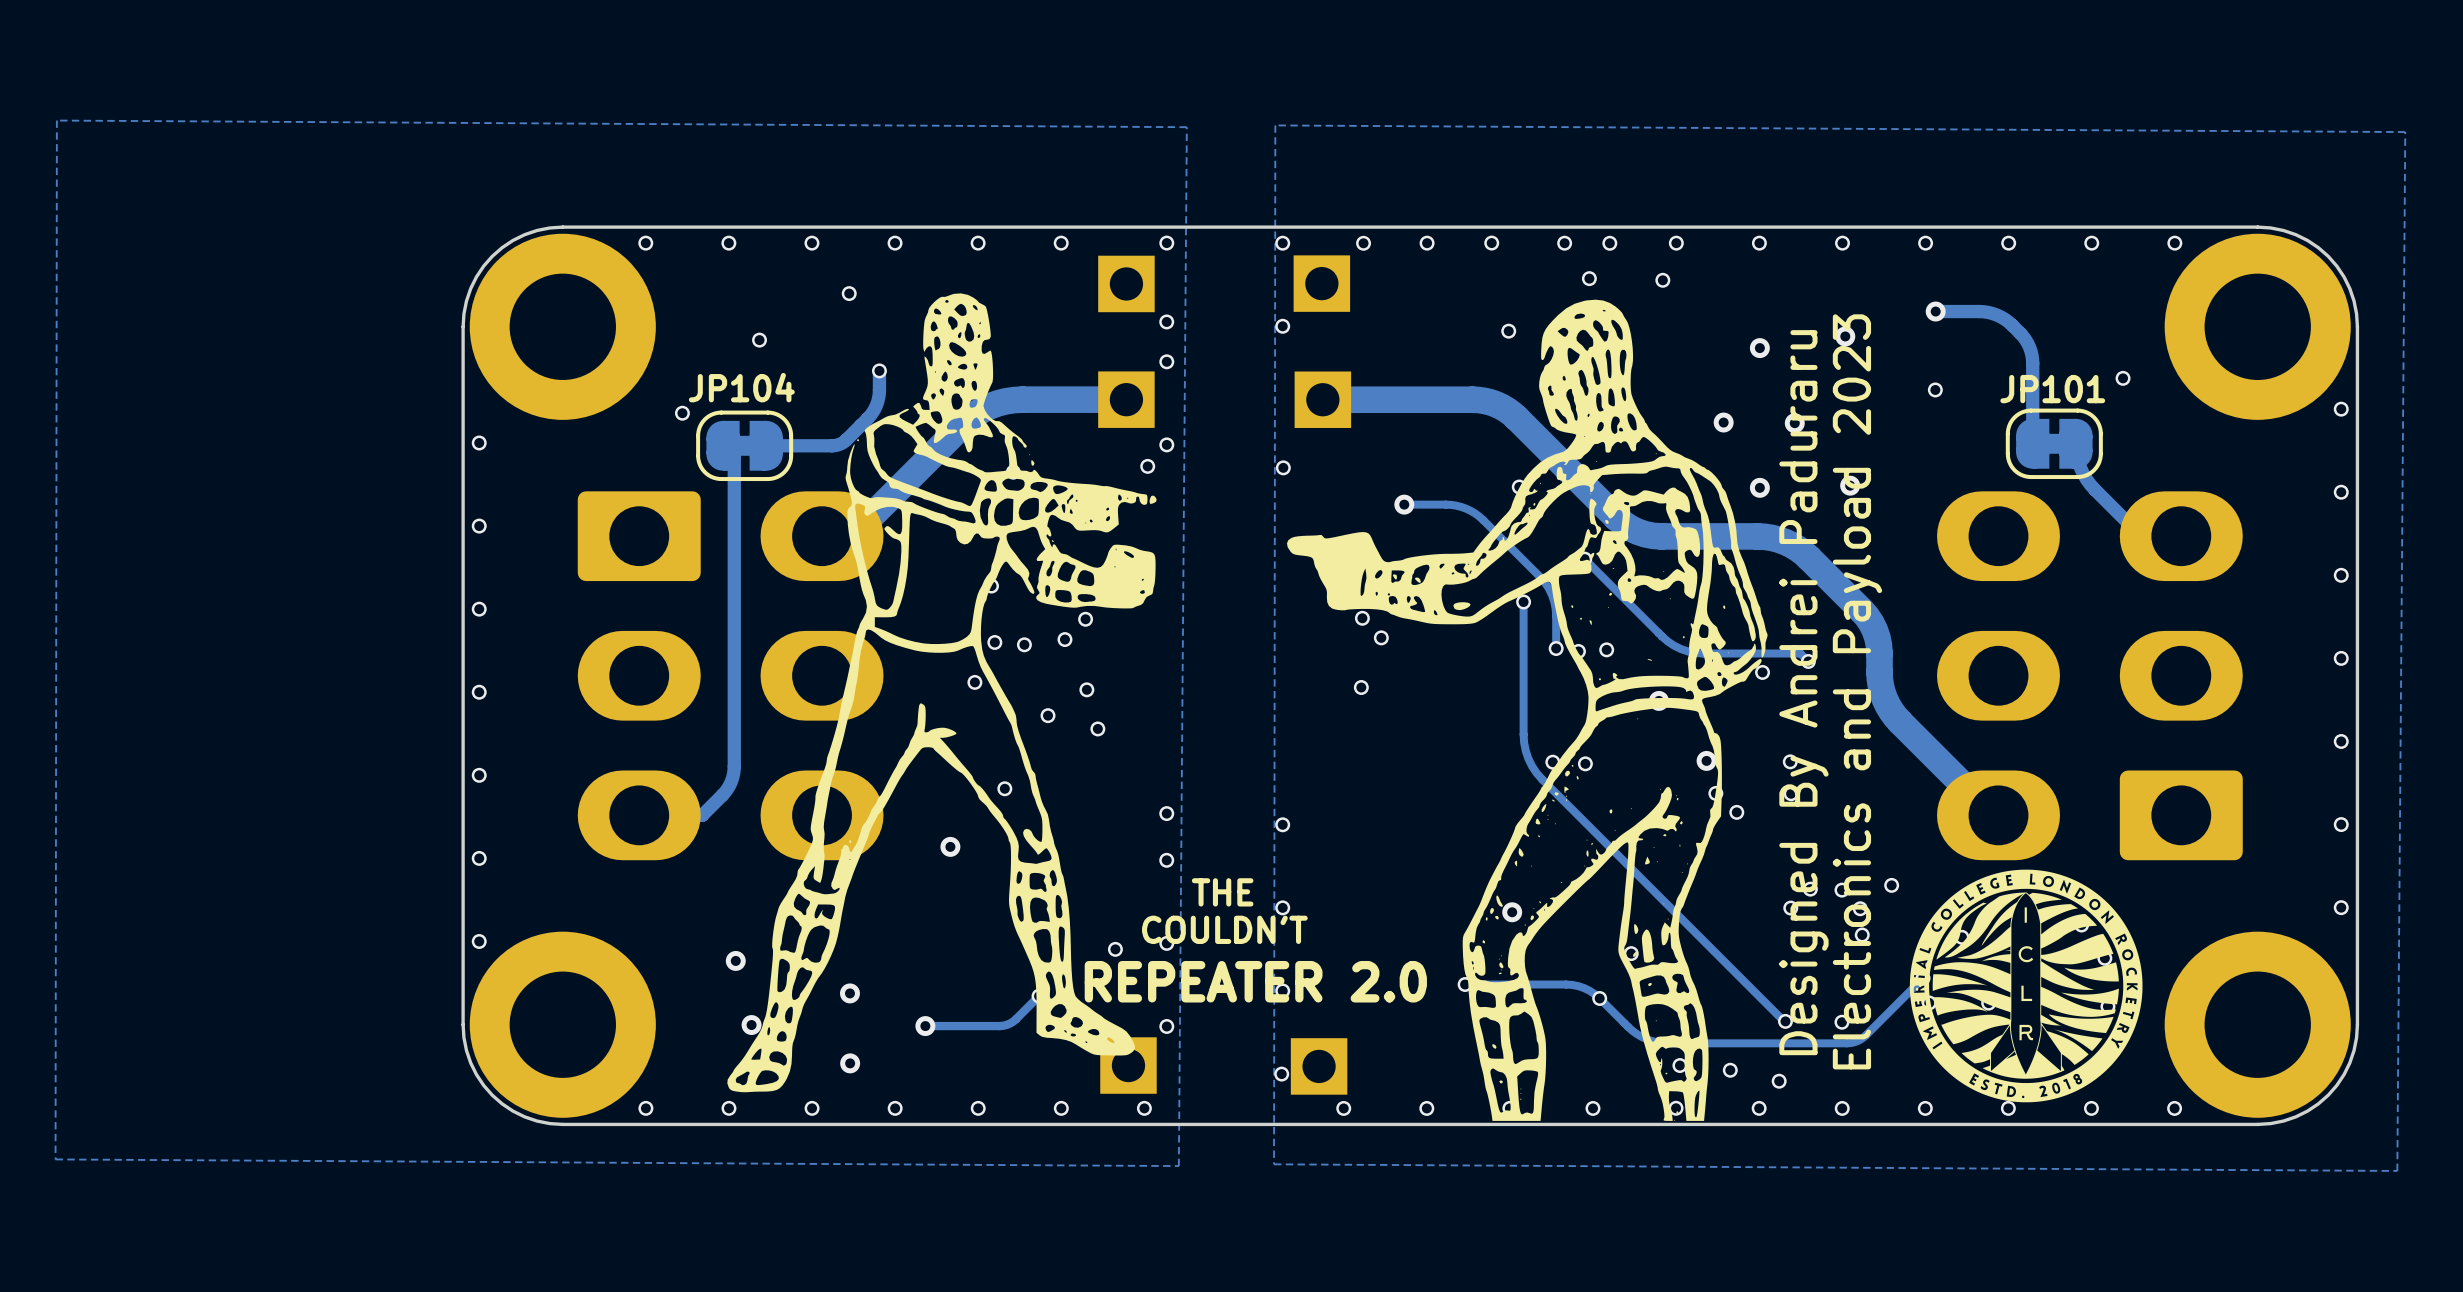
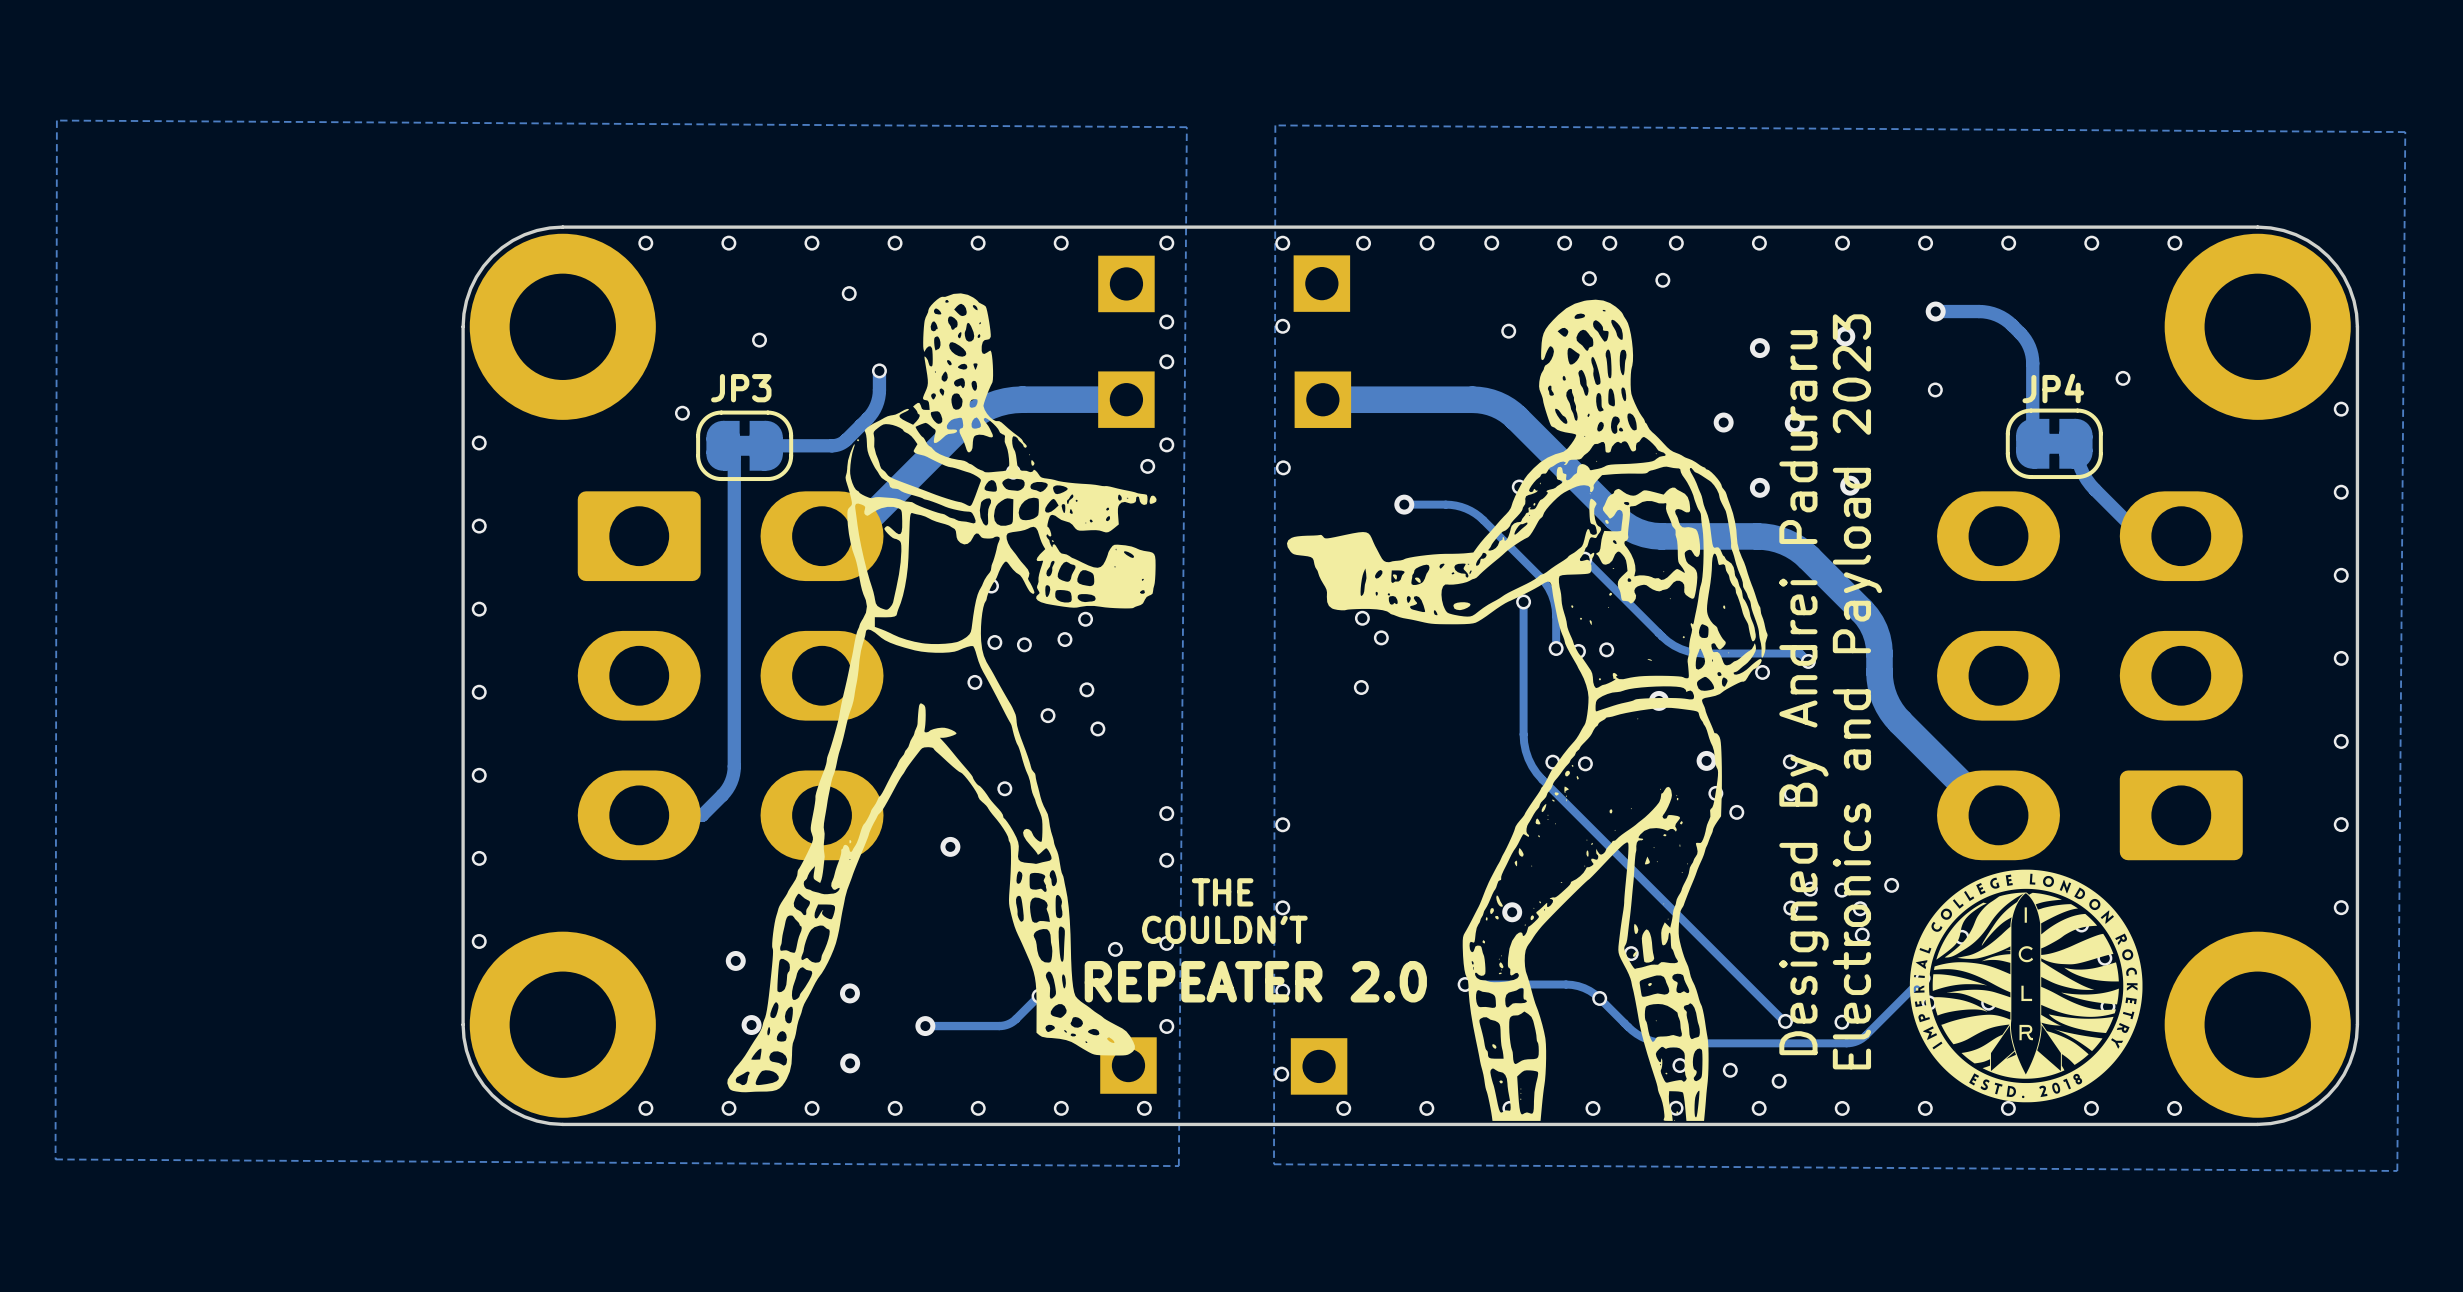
JP104 name: JP104 (741, 387) -> JP3 (741, 388)
JP101 name: JP101 (2052, 389) -> JP4 (2053, 388)

